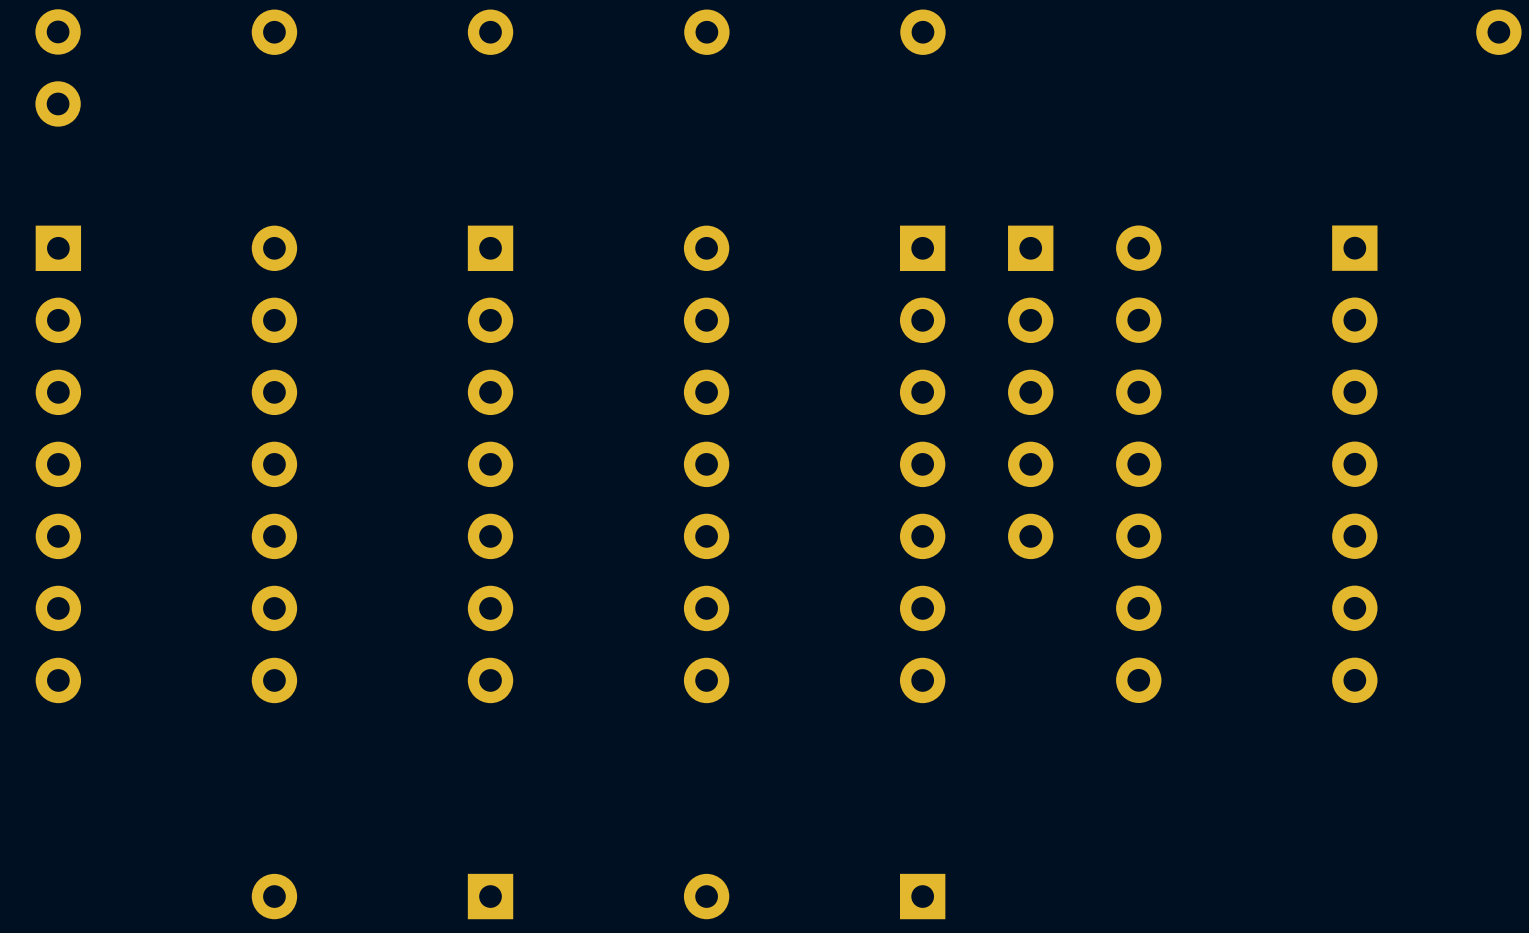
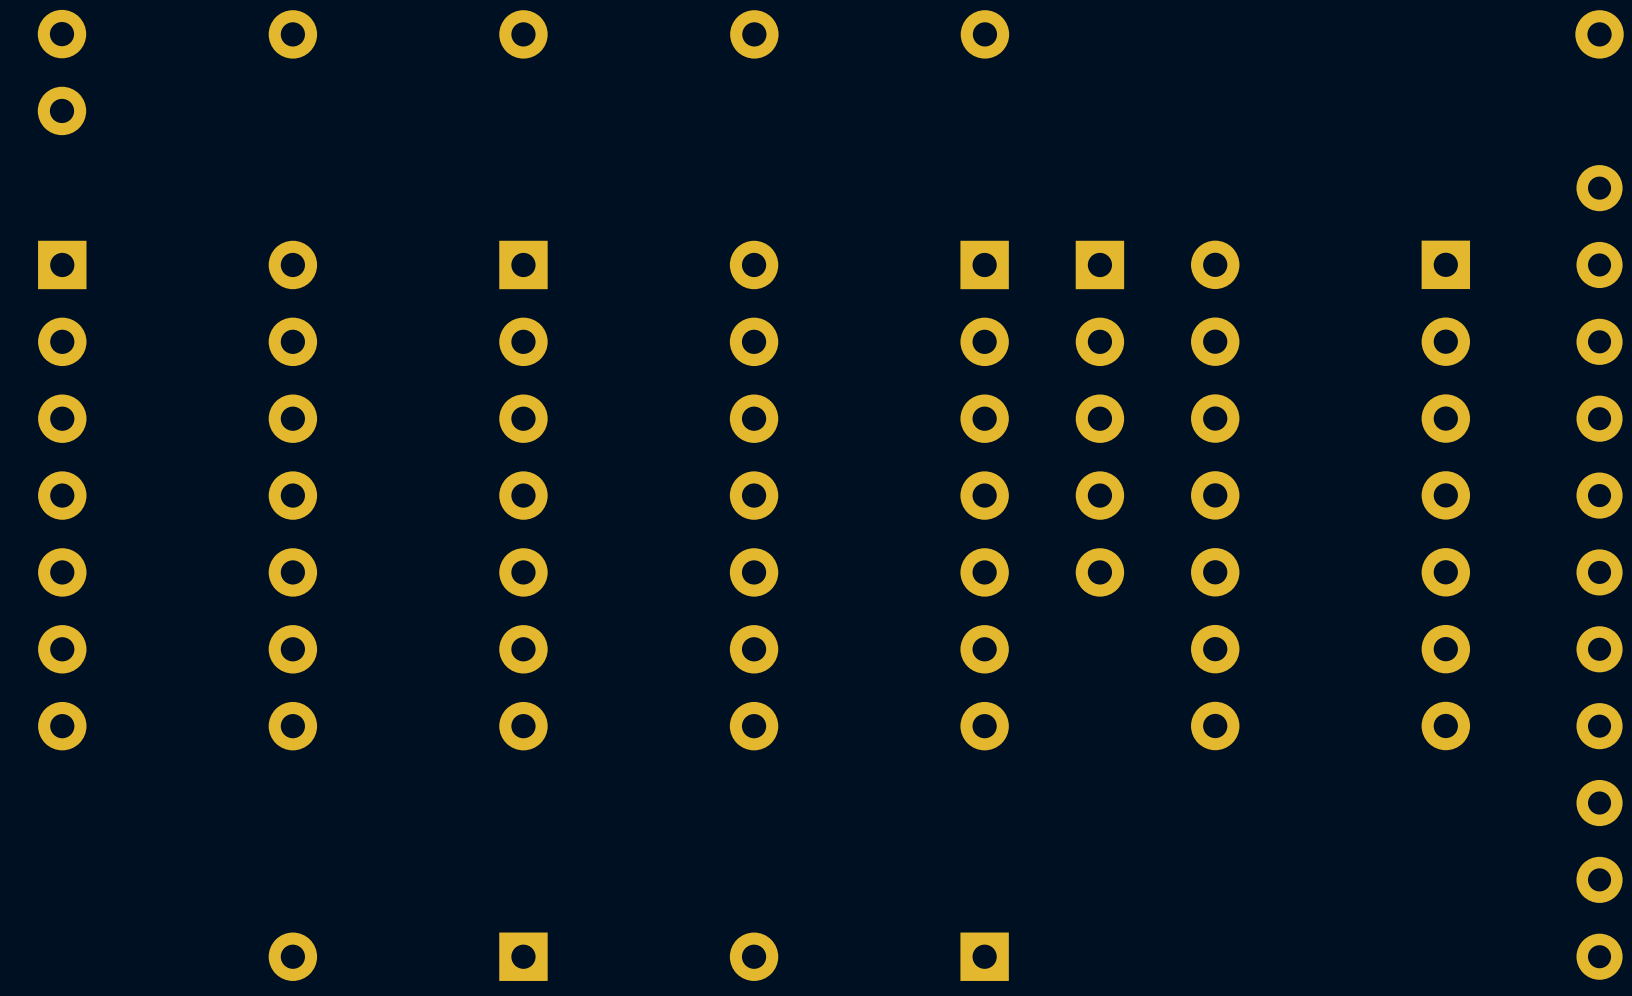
part: none -> (1599, 188)
part: none -> (1599, 264)
part: none -> (1599, 341)
part: none -> (1599, 418)
part: none -> (1599, 495)
part: none -> (1599, 572)
part: none -> (1599, 649)
part: none -> (1599, 726)
part: none -> (1599, 803)
part: none -> (1599, 879)
part: none -> (1599, 956)

